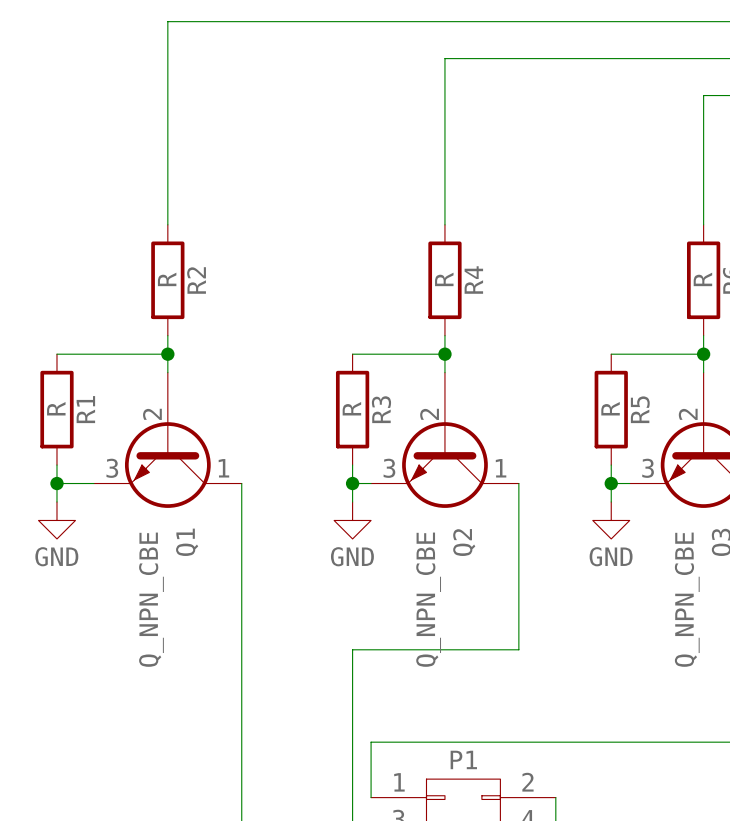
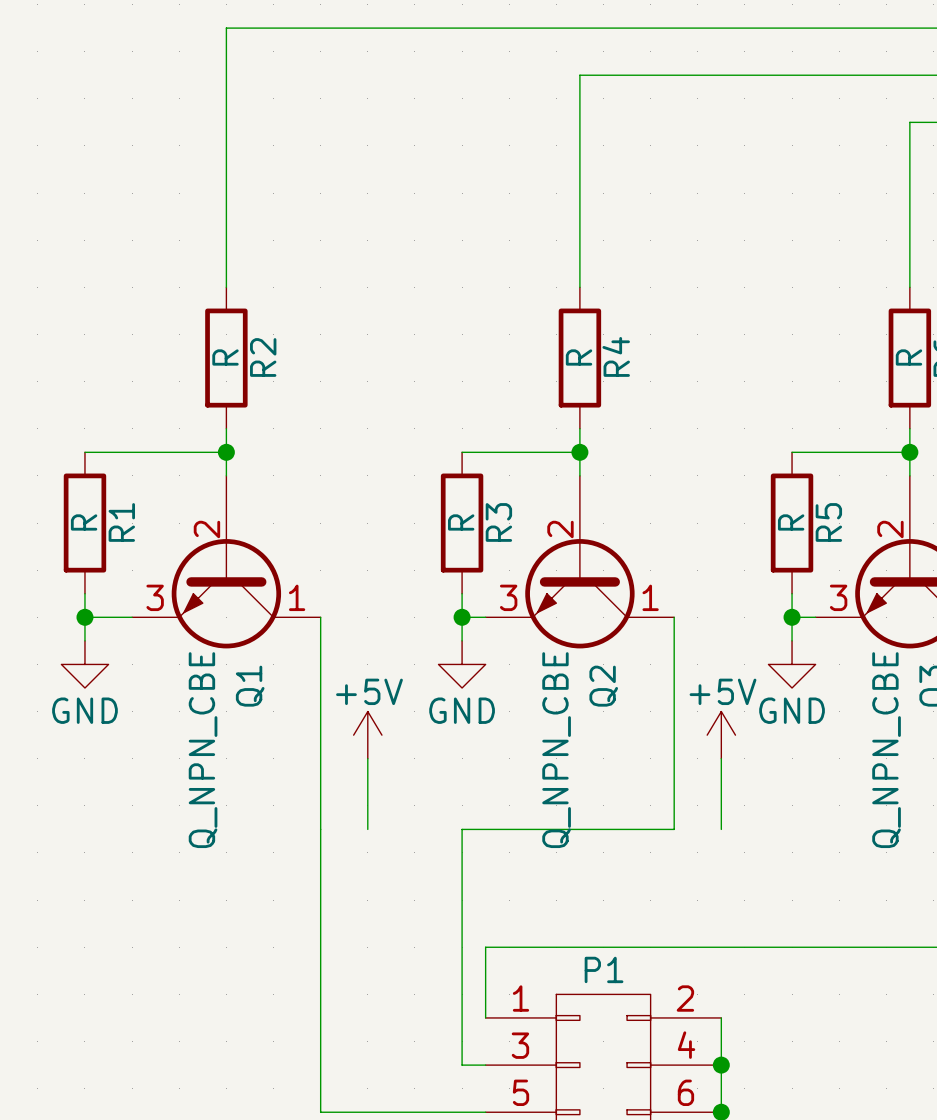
power symbol: none -> +5V (367, 735)
power symbol: none -> +5V (721, 735)
wire: none -> (367, 758) (367, 829)
wire: none -> (721, 758) (721, 829)

